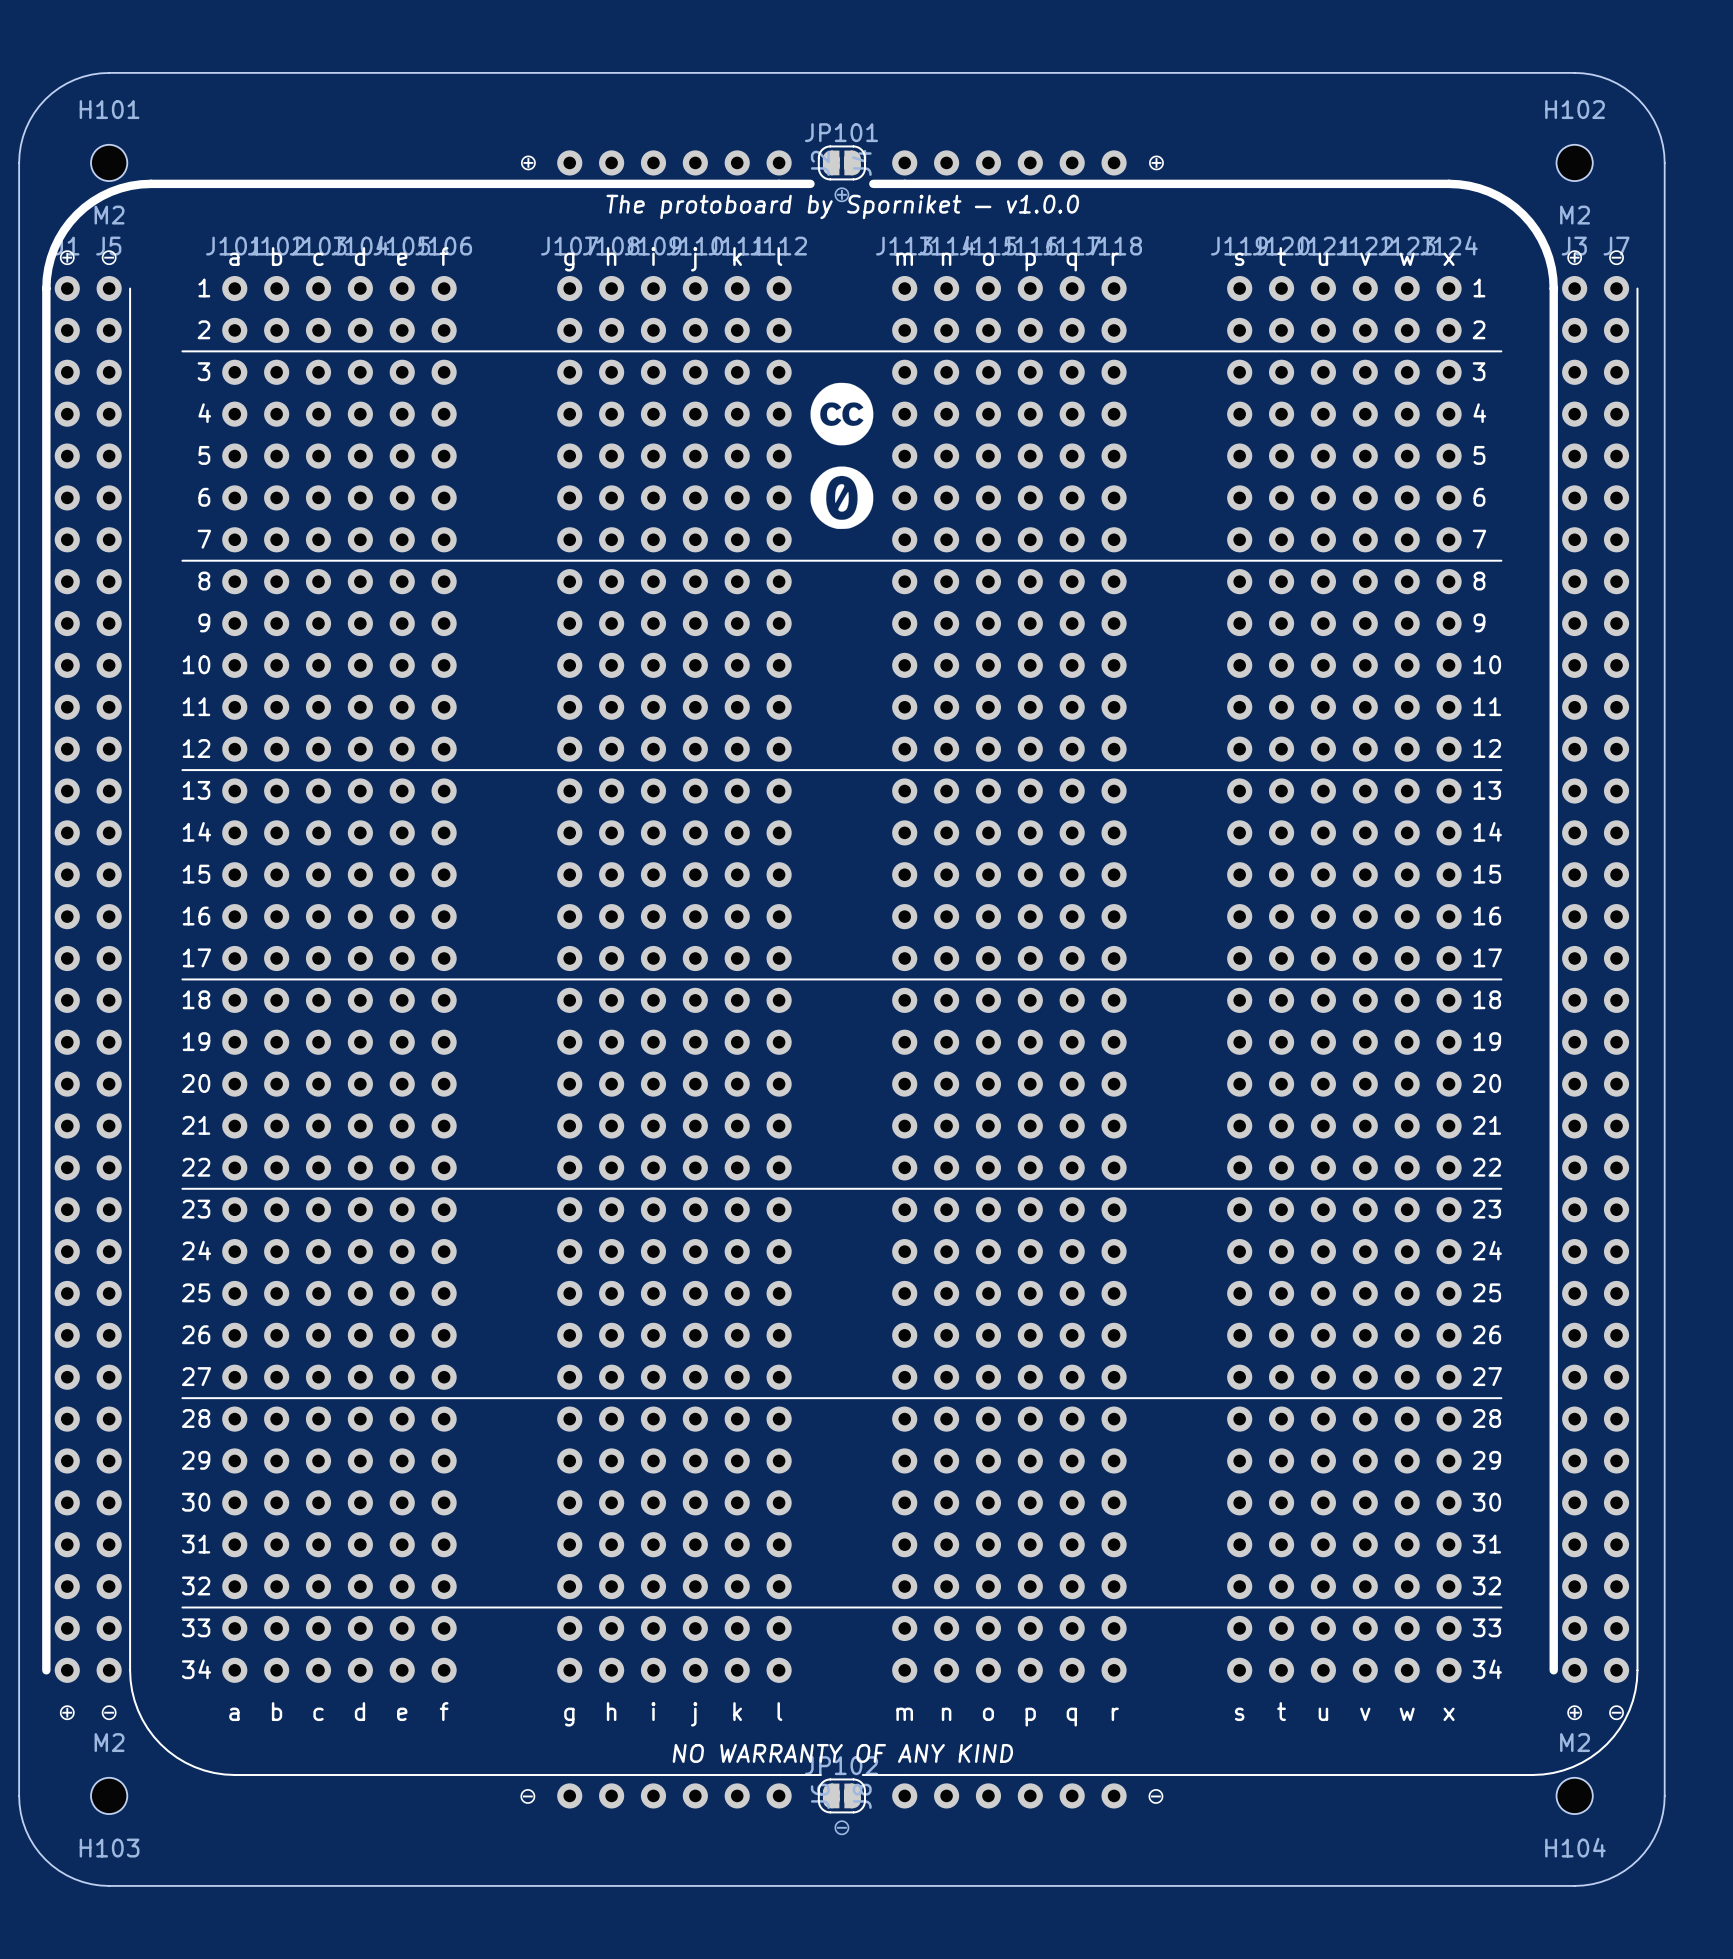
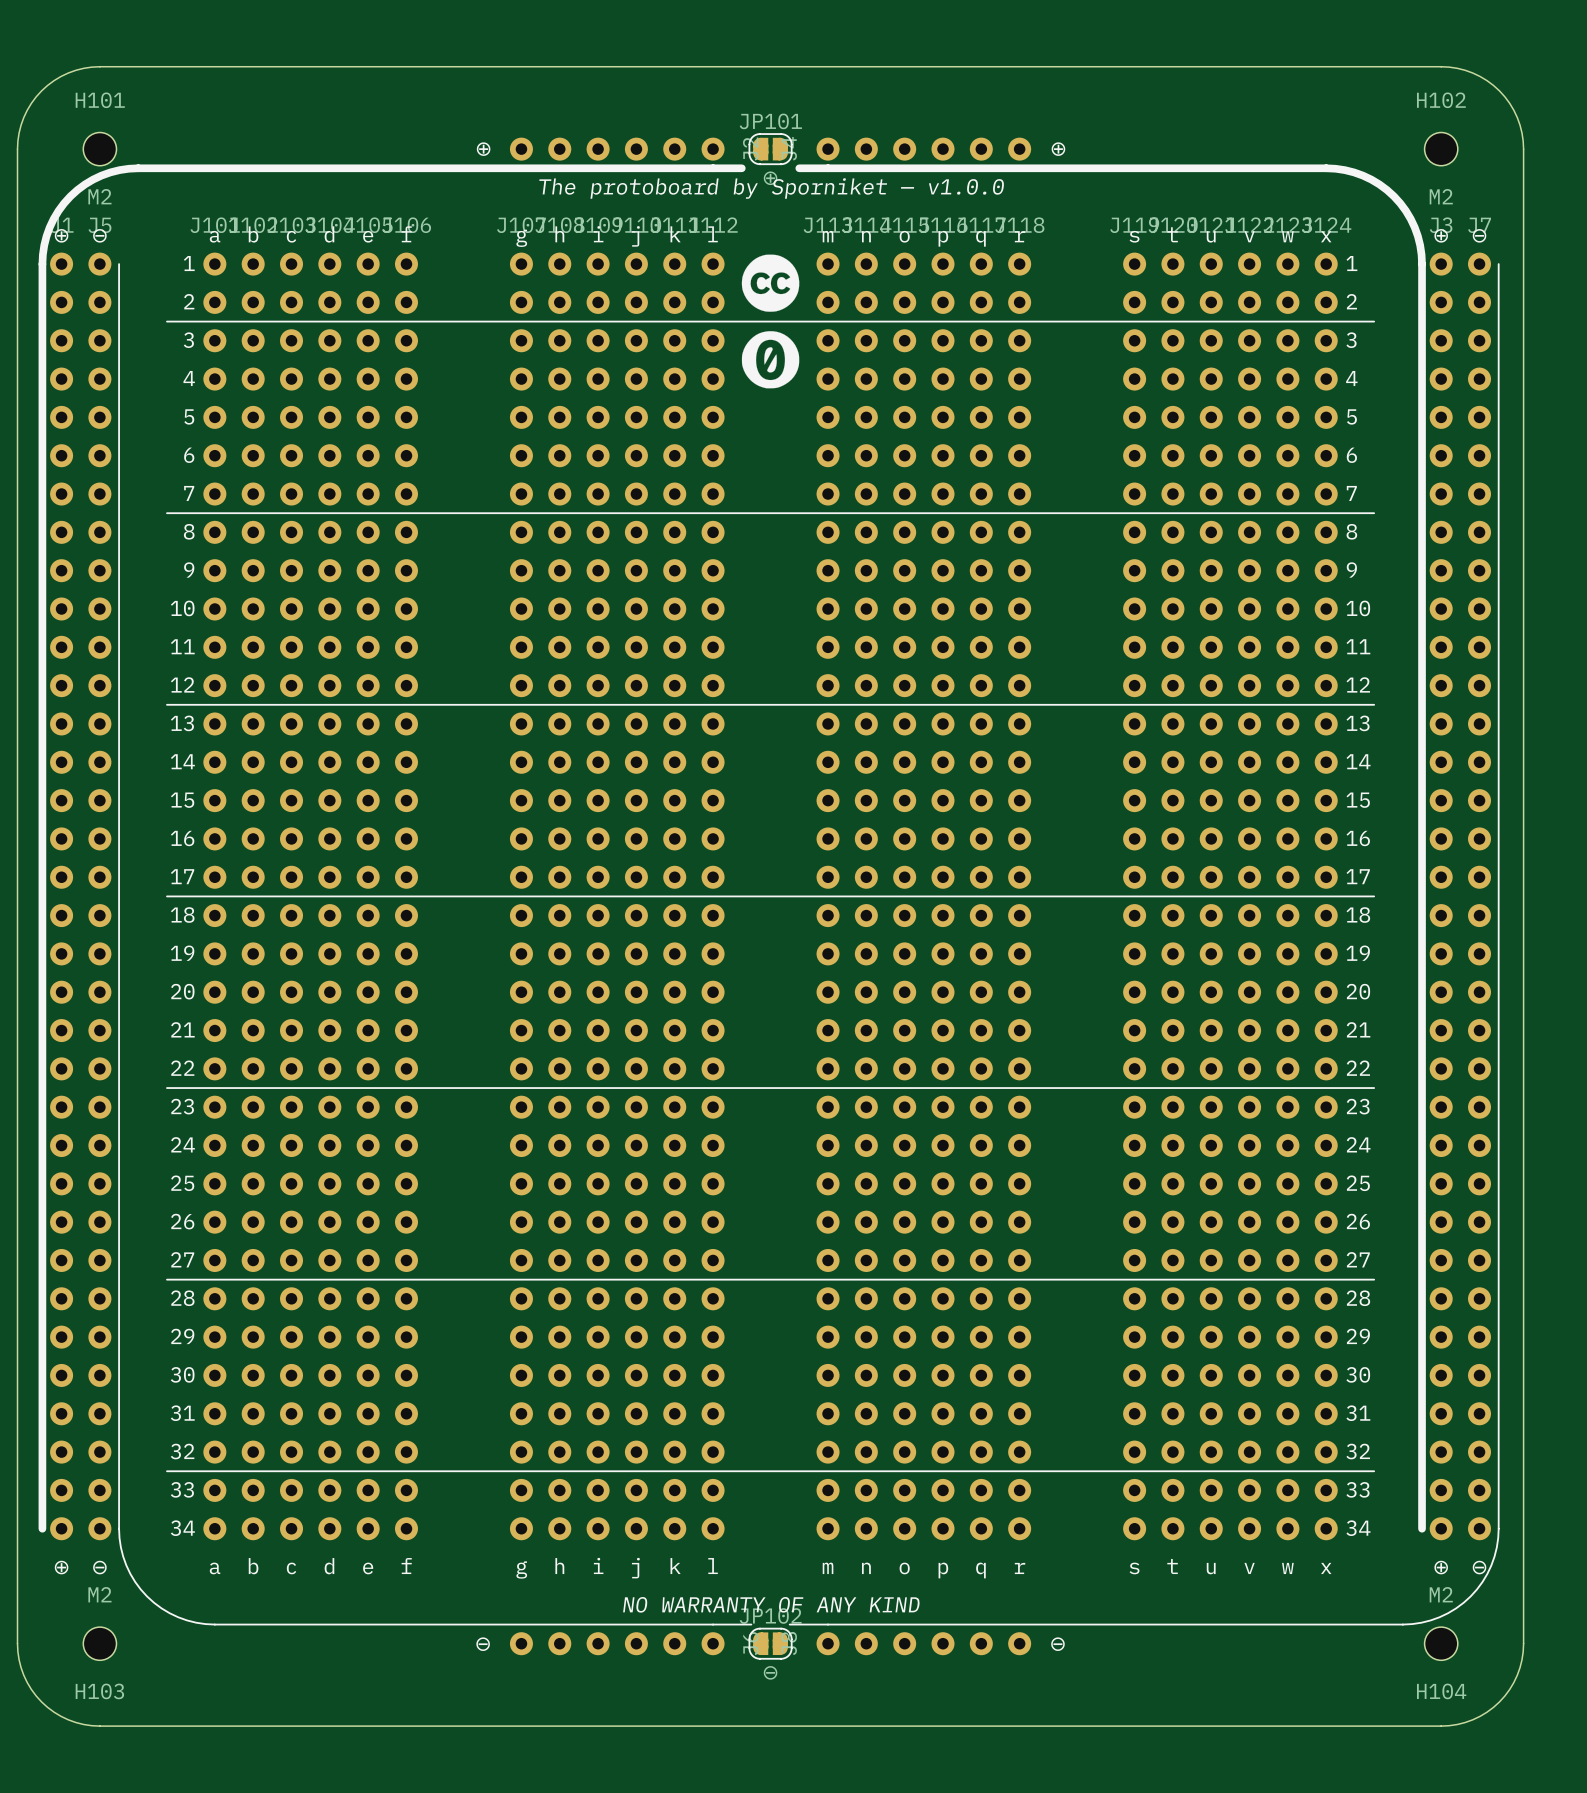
drawing position: (841, 414) -> (770, 283)
drawing position: (841, 497) -> (770, 359)

